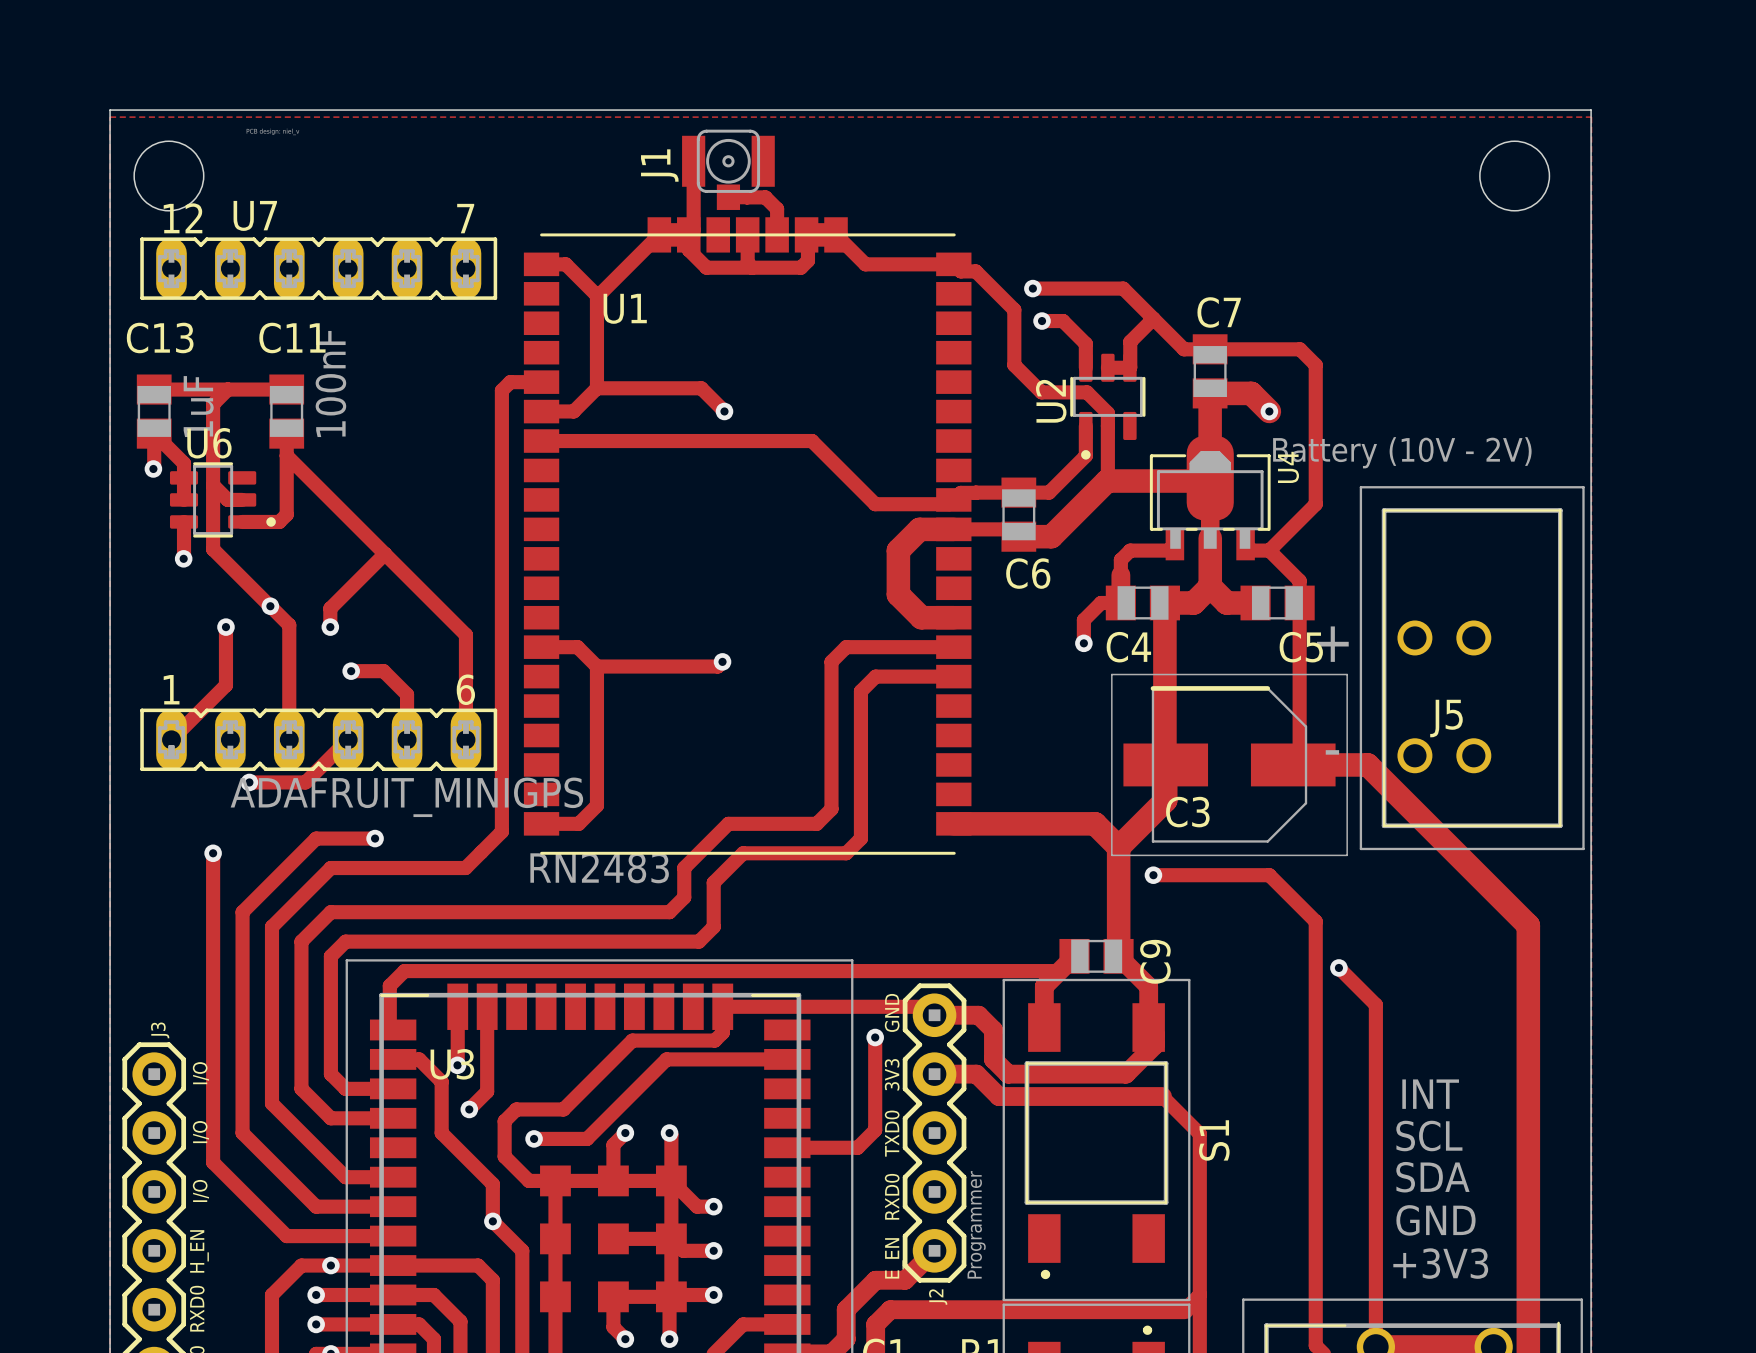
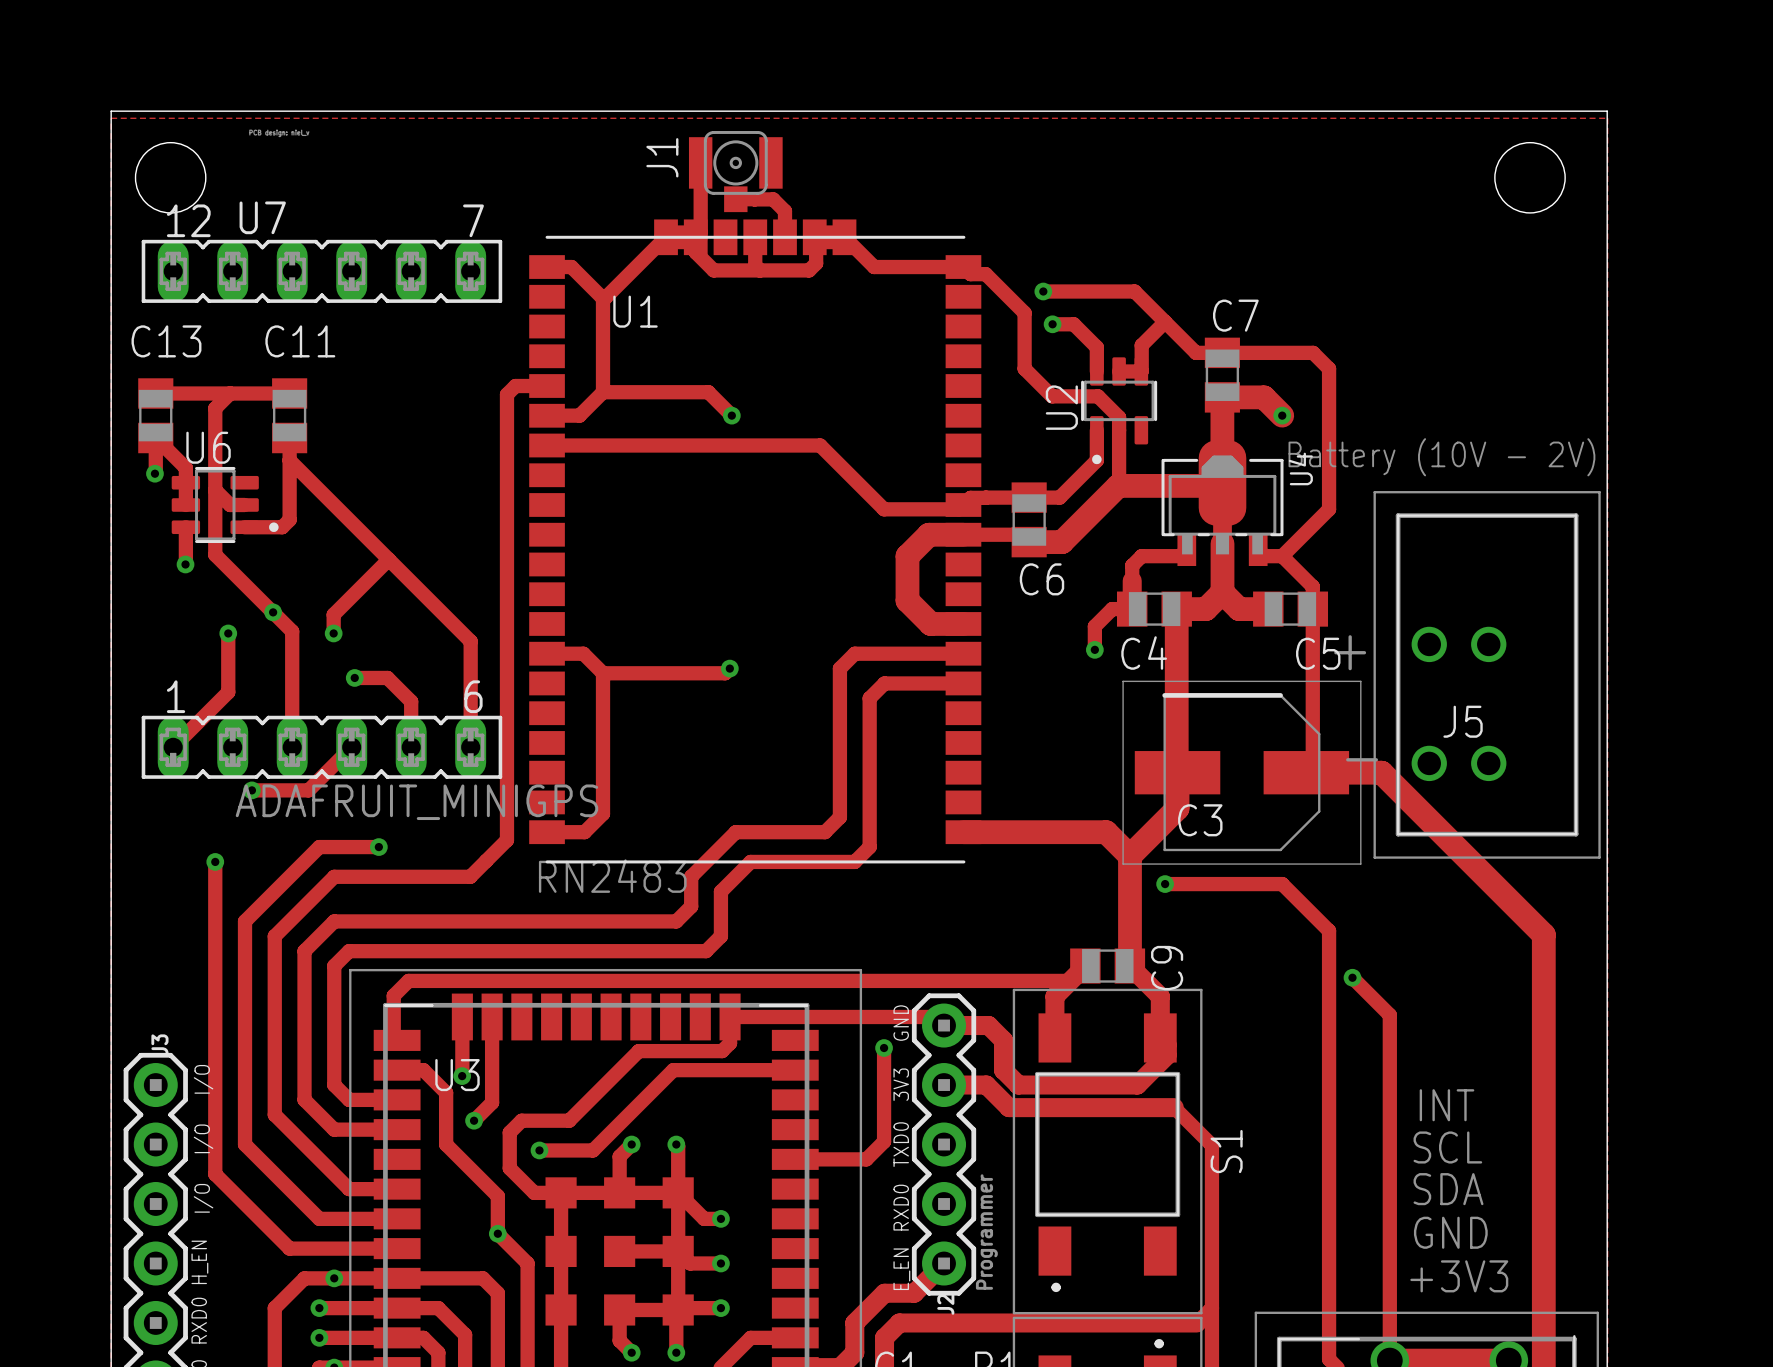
C11 value: 100nF (330, 383) -> none
C13 value: 1uF (198, 406) -> none

